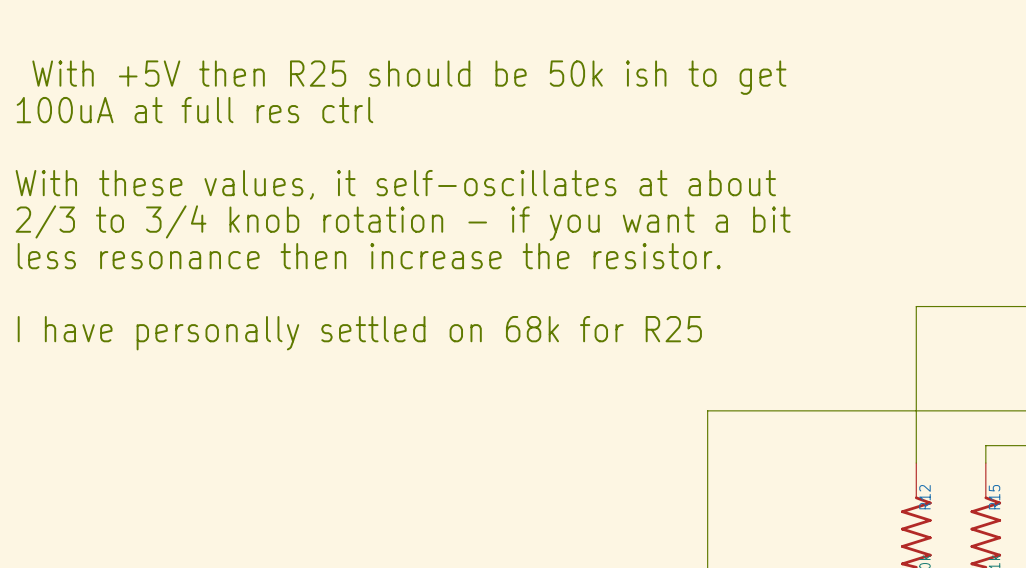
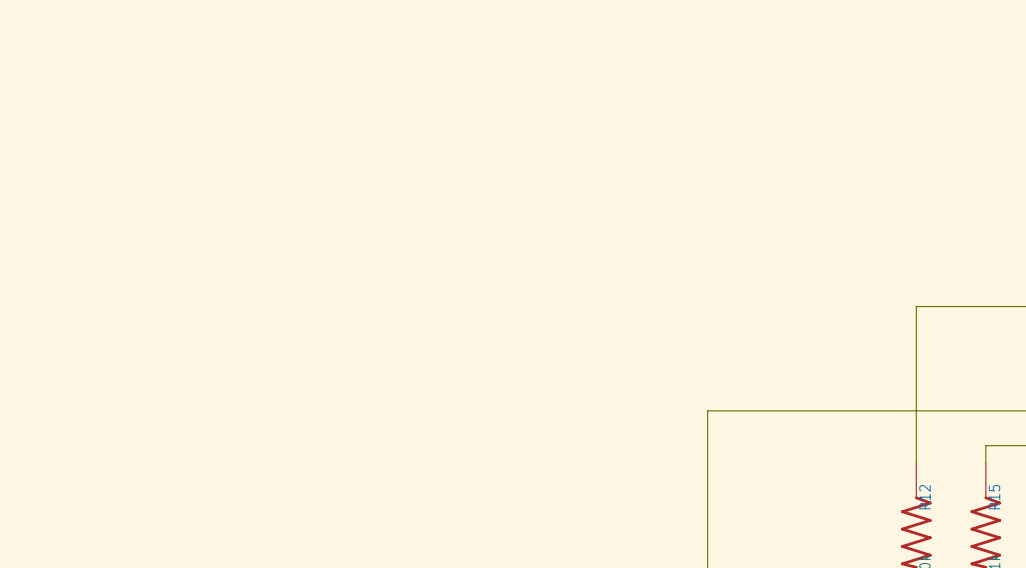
text: With +5V then R25 should be 50k ish to get (409, 77) -> none
text: 100uA at full res ctrl (194, 110) -> none
text: With these values, it self-oscillates at about (395, 184) -> none
text: 2/3 to 3/4 knob rotation - if you want a bit (403, 223) -> none
text: less resonance then increase the resistor. (369, 256) -> none
text: I have personally settled on 68k for R25 (359, 333) -> none

